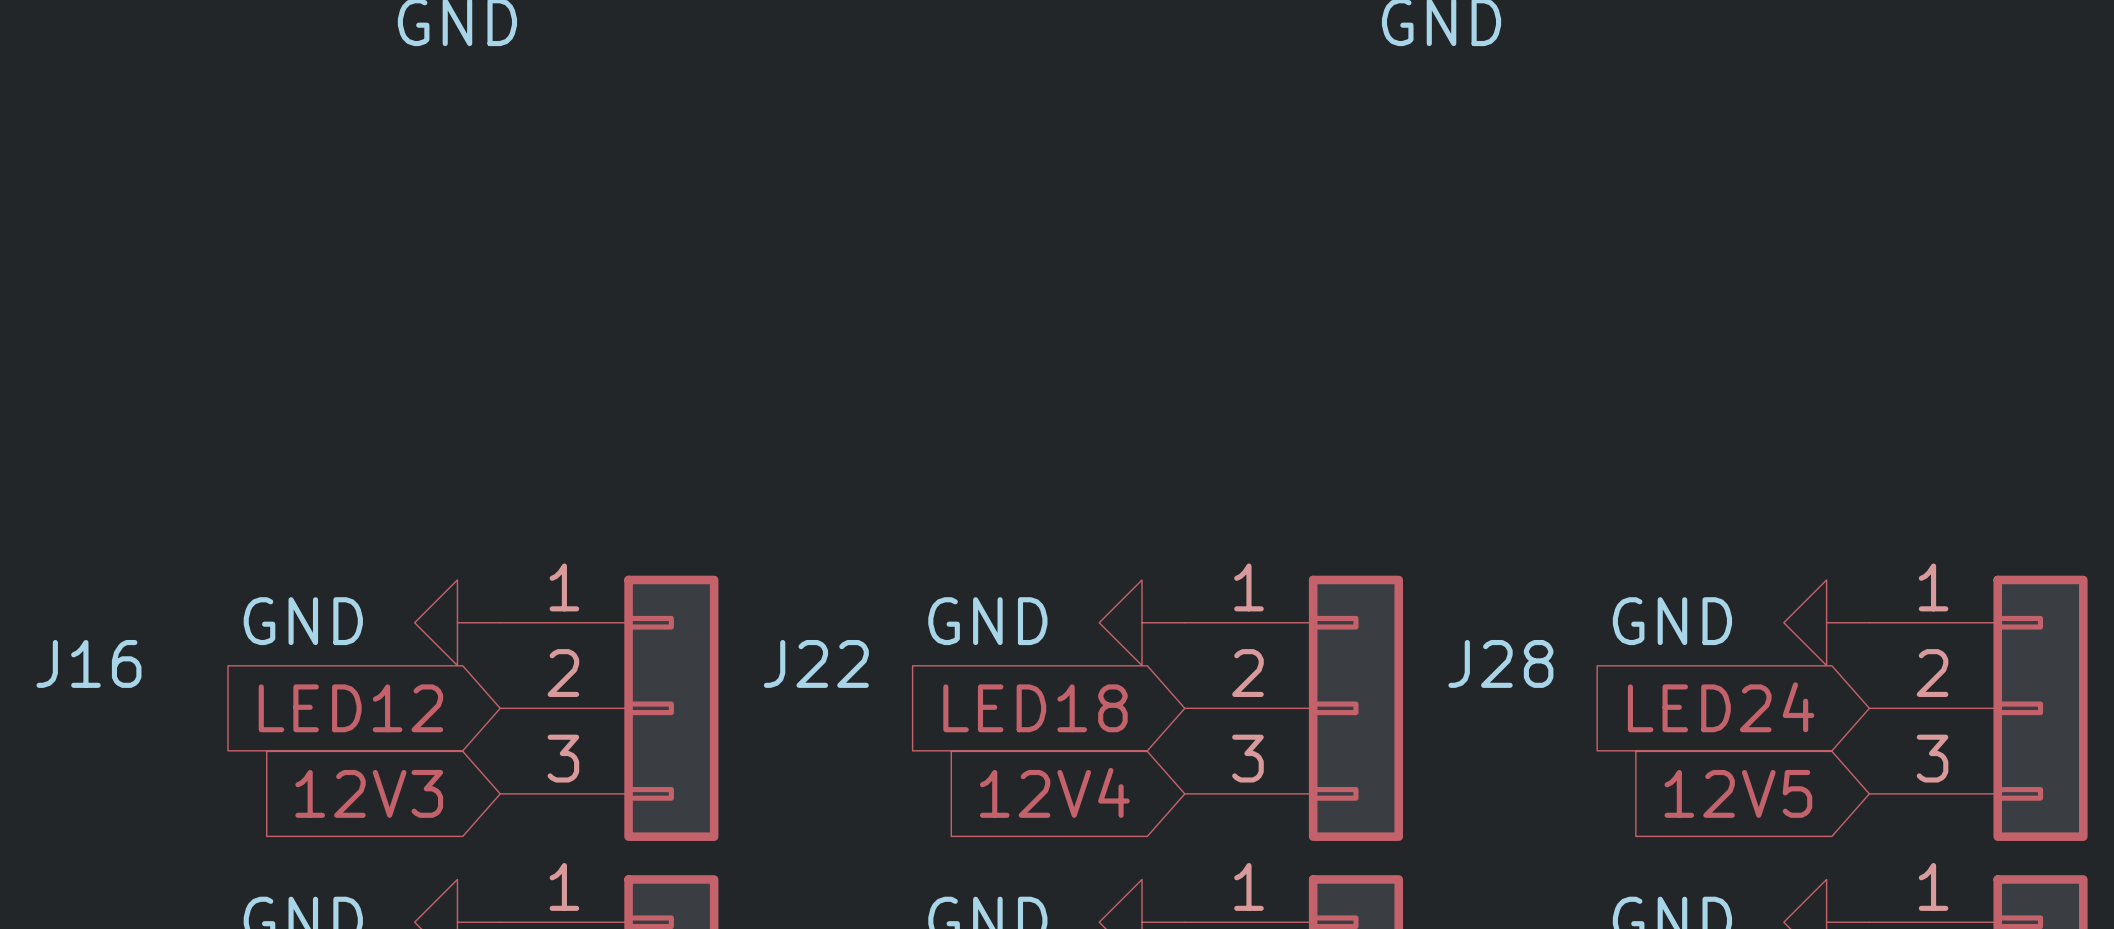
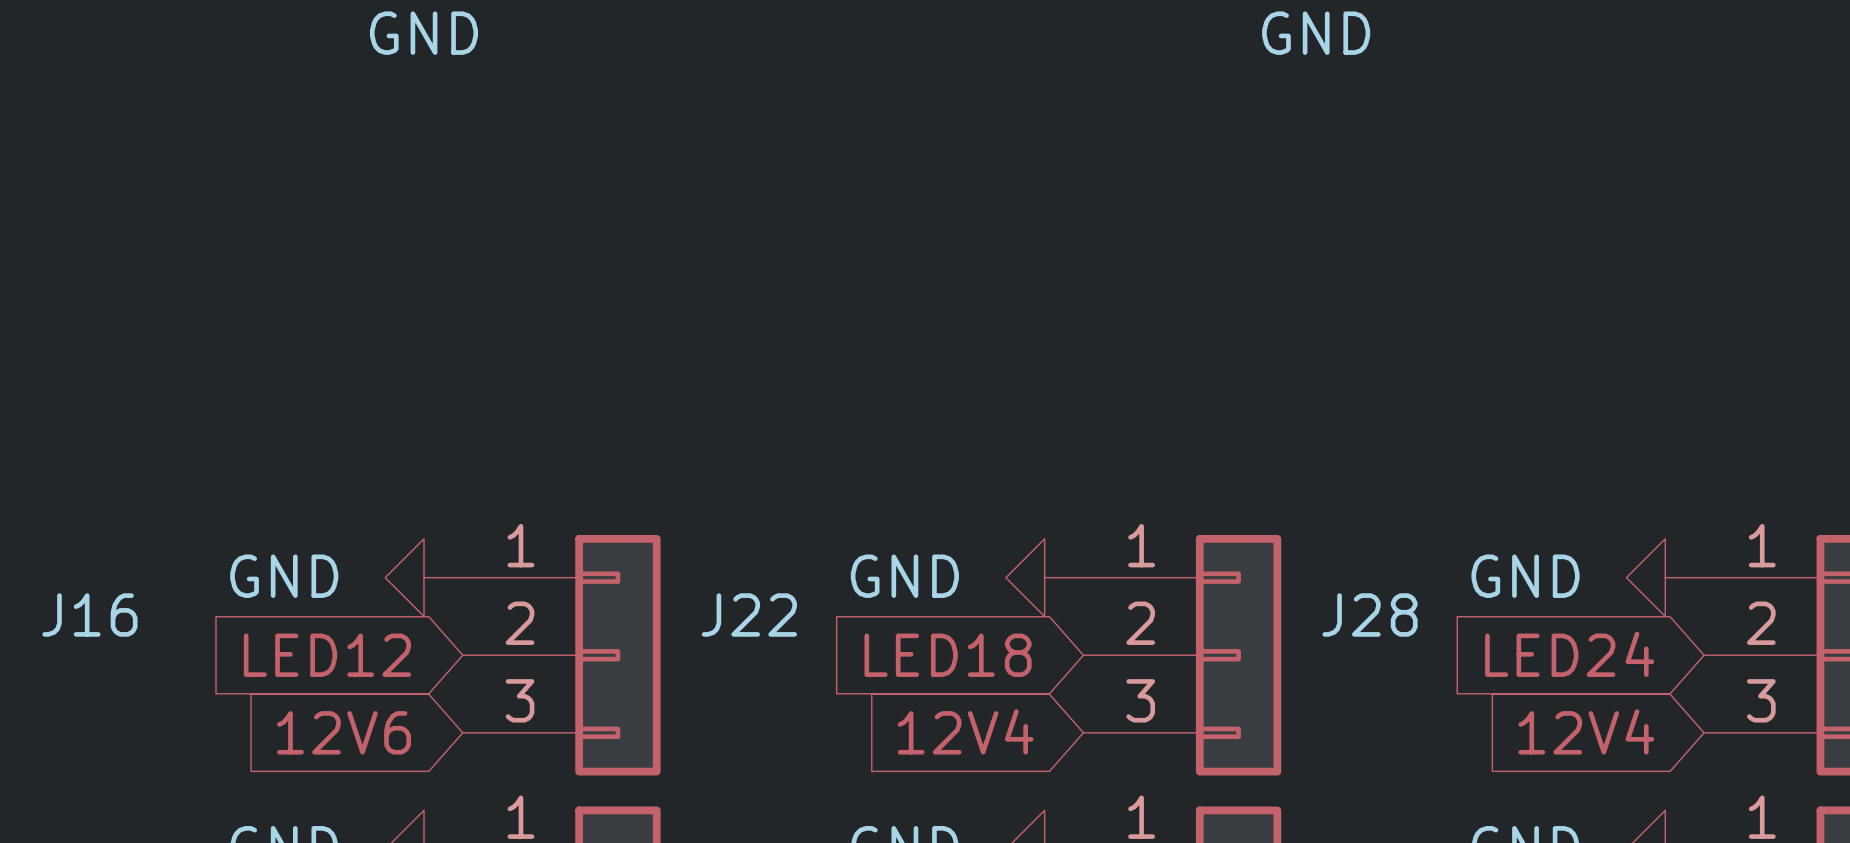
global label: 12V3 (369, 793) -> 12V6 (344, 732)
global label: 12V5 (1738, 793) -> 12V4 (1586, 731)

